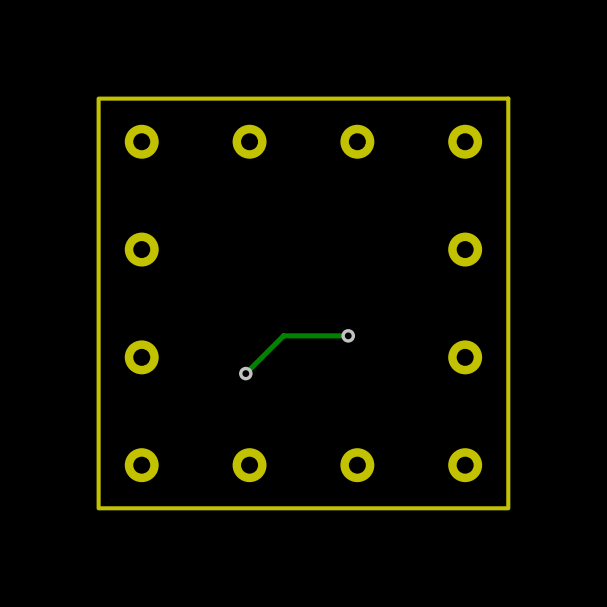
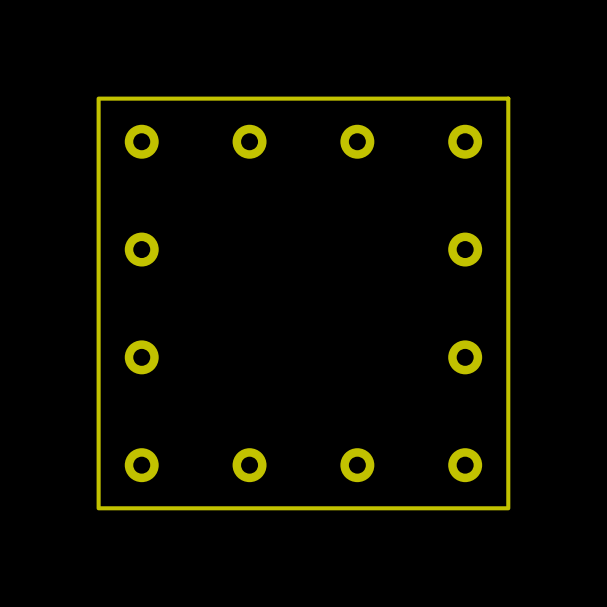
track: (348, 335) (283, 335) (245, 373) -> none
via: (348, 335) -> none
via: (245, 373) -> none

